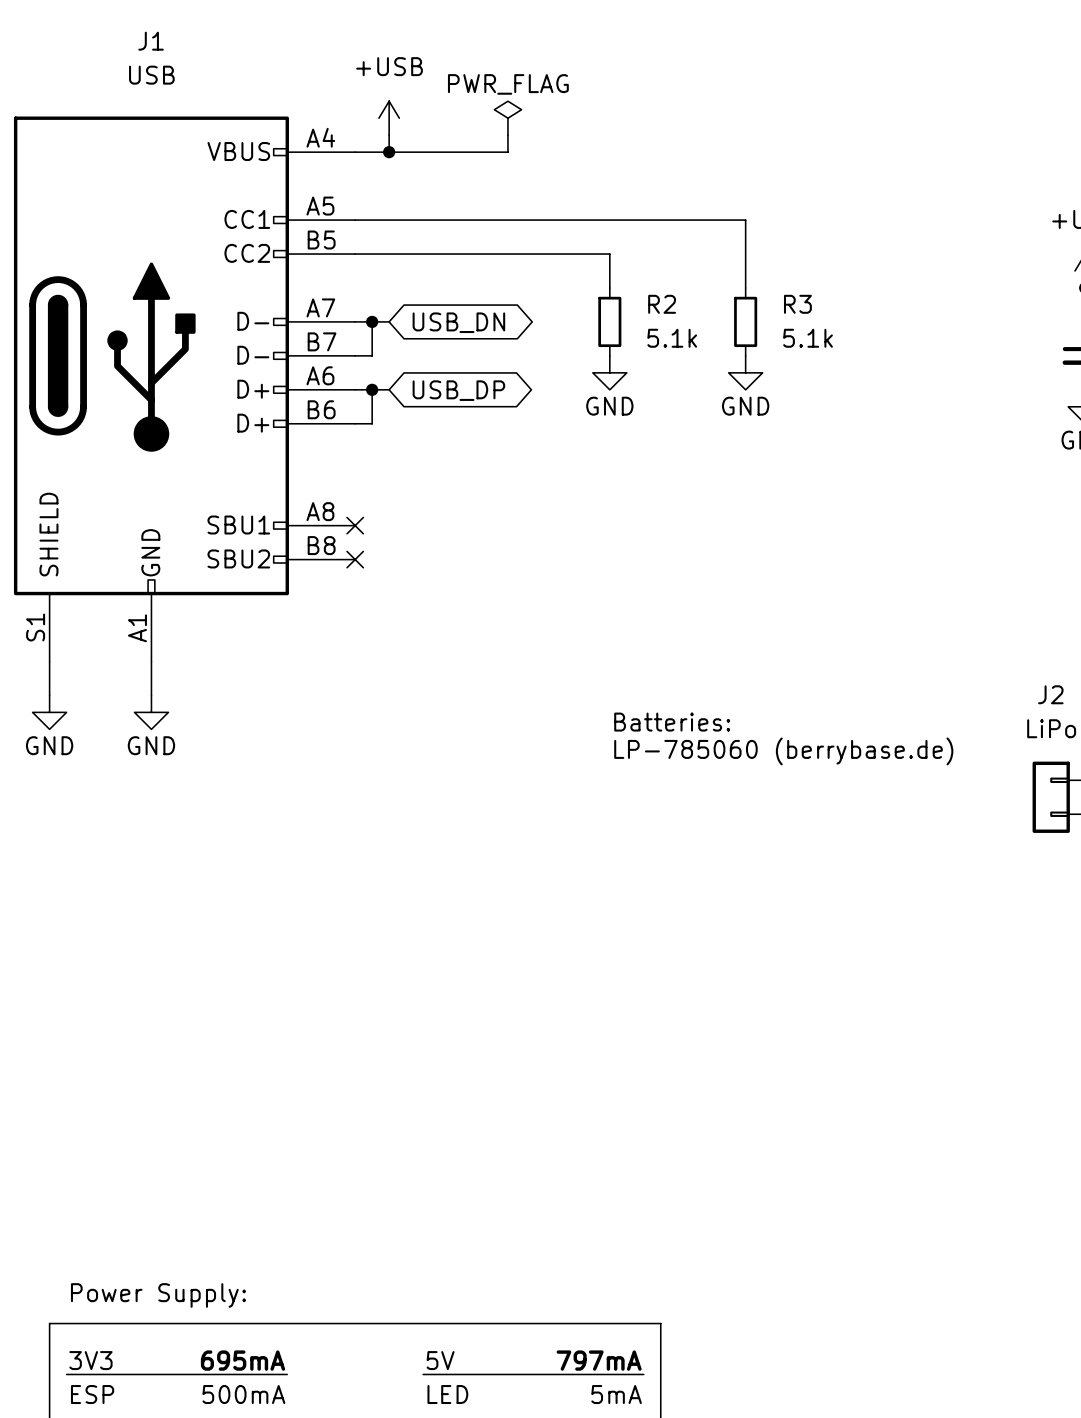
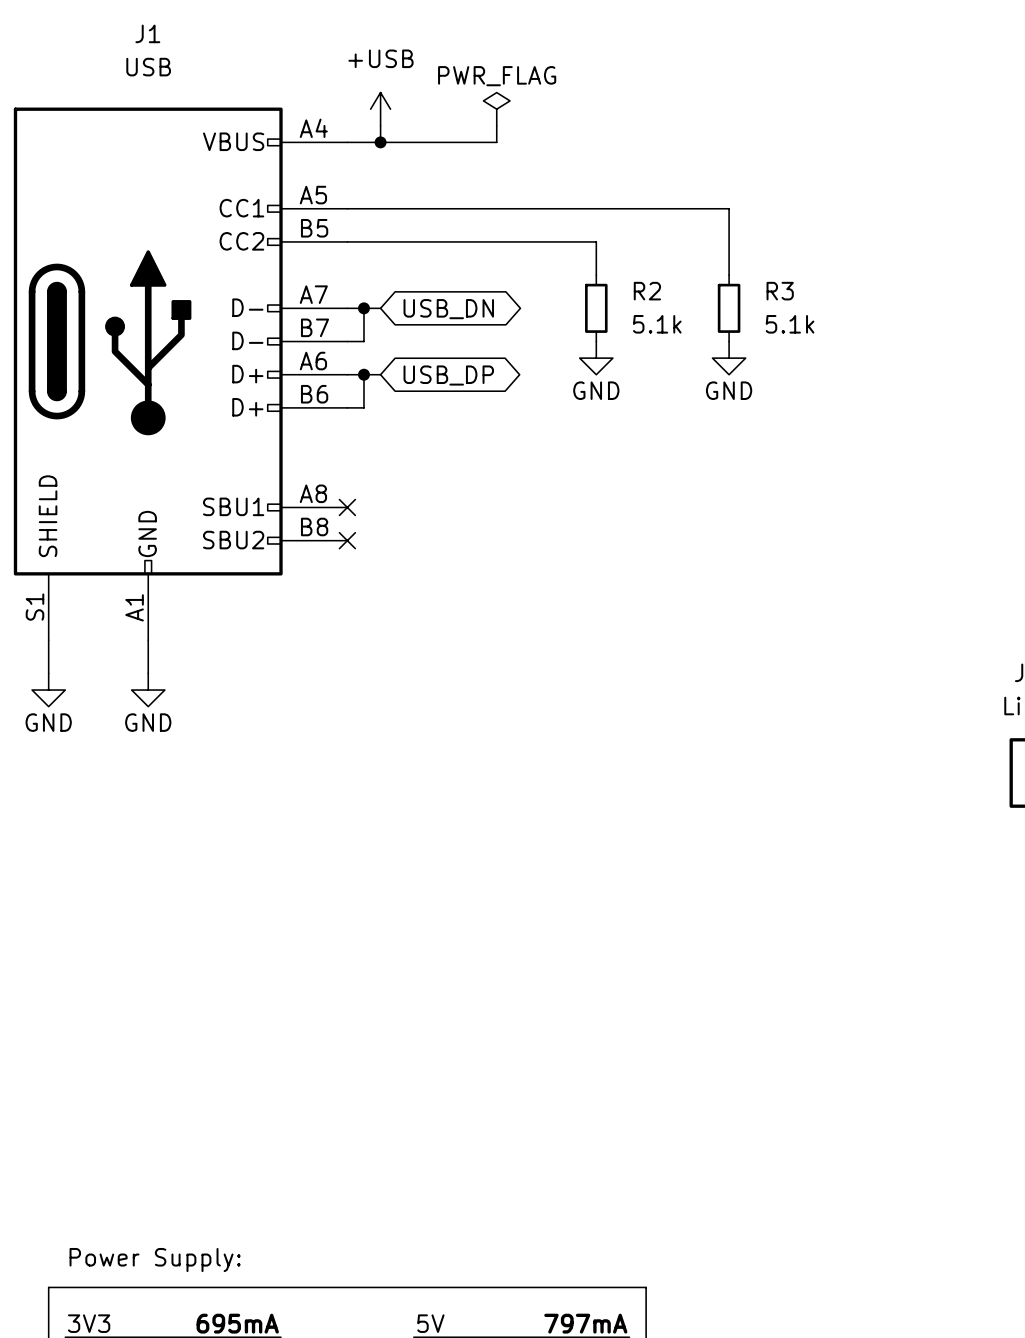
text: Batteries: (672, 722) -> none
text: LP-785060 (berrybase.de) (783, 751) -> none

